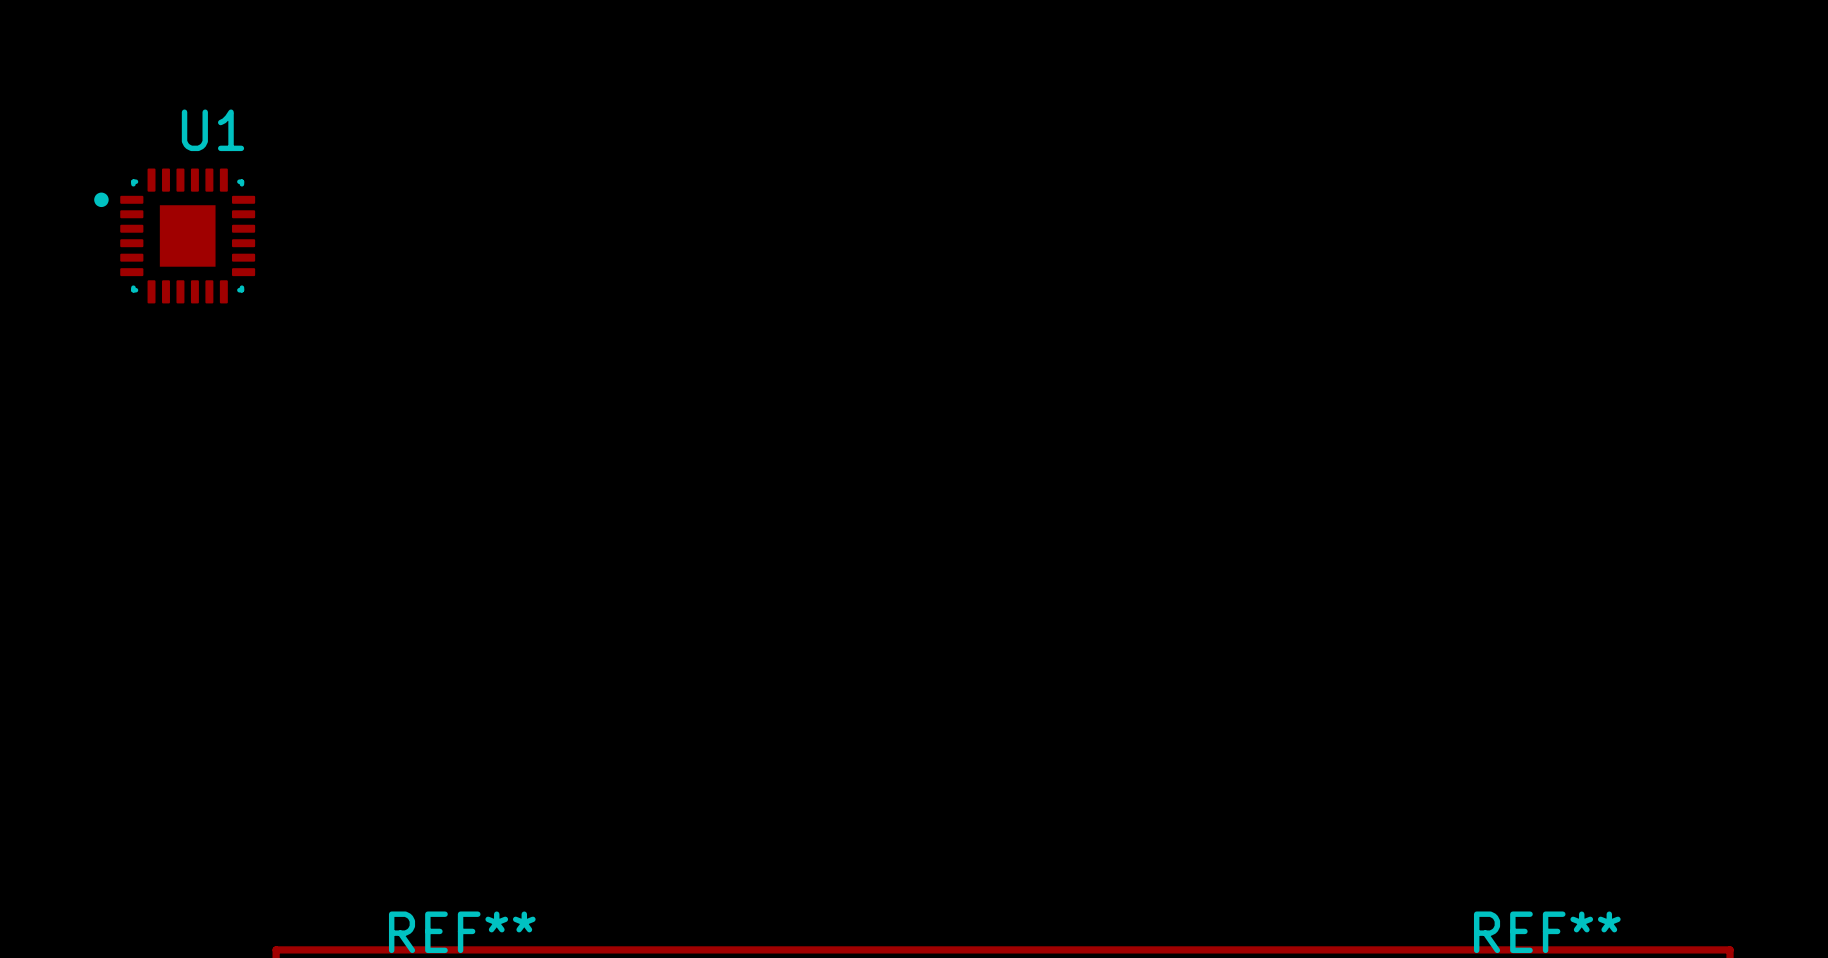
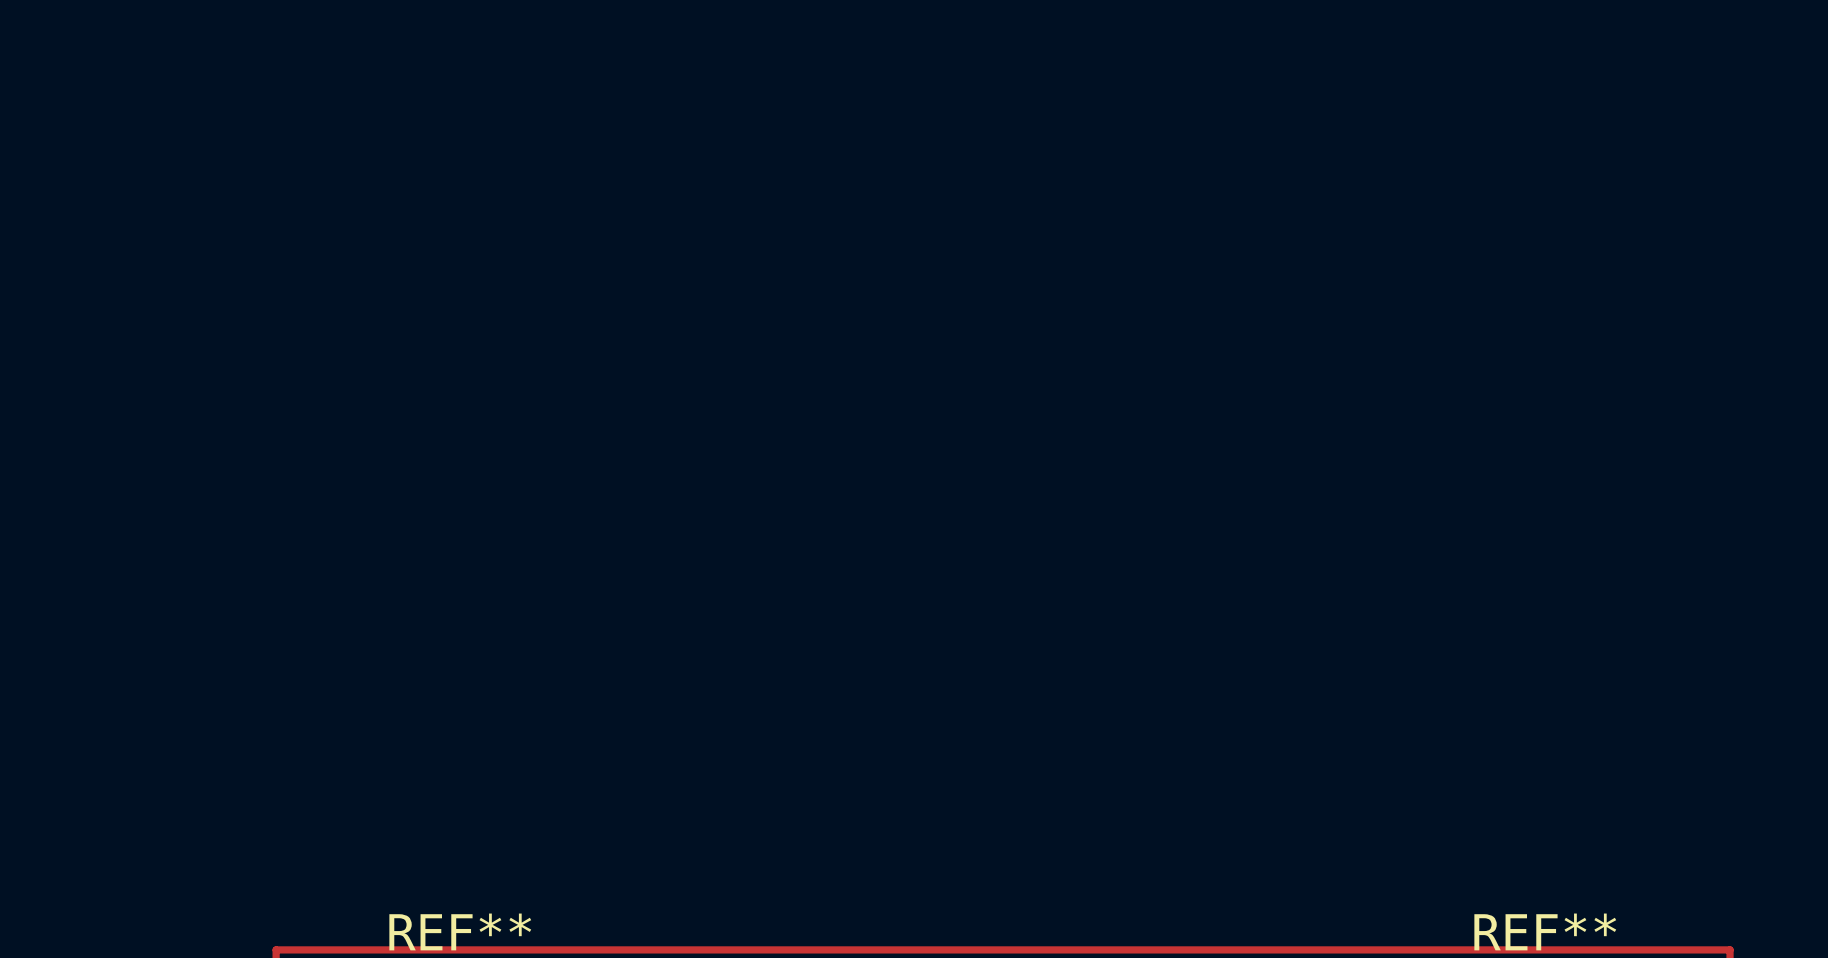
U1: (174, 235) -> none

